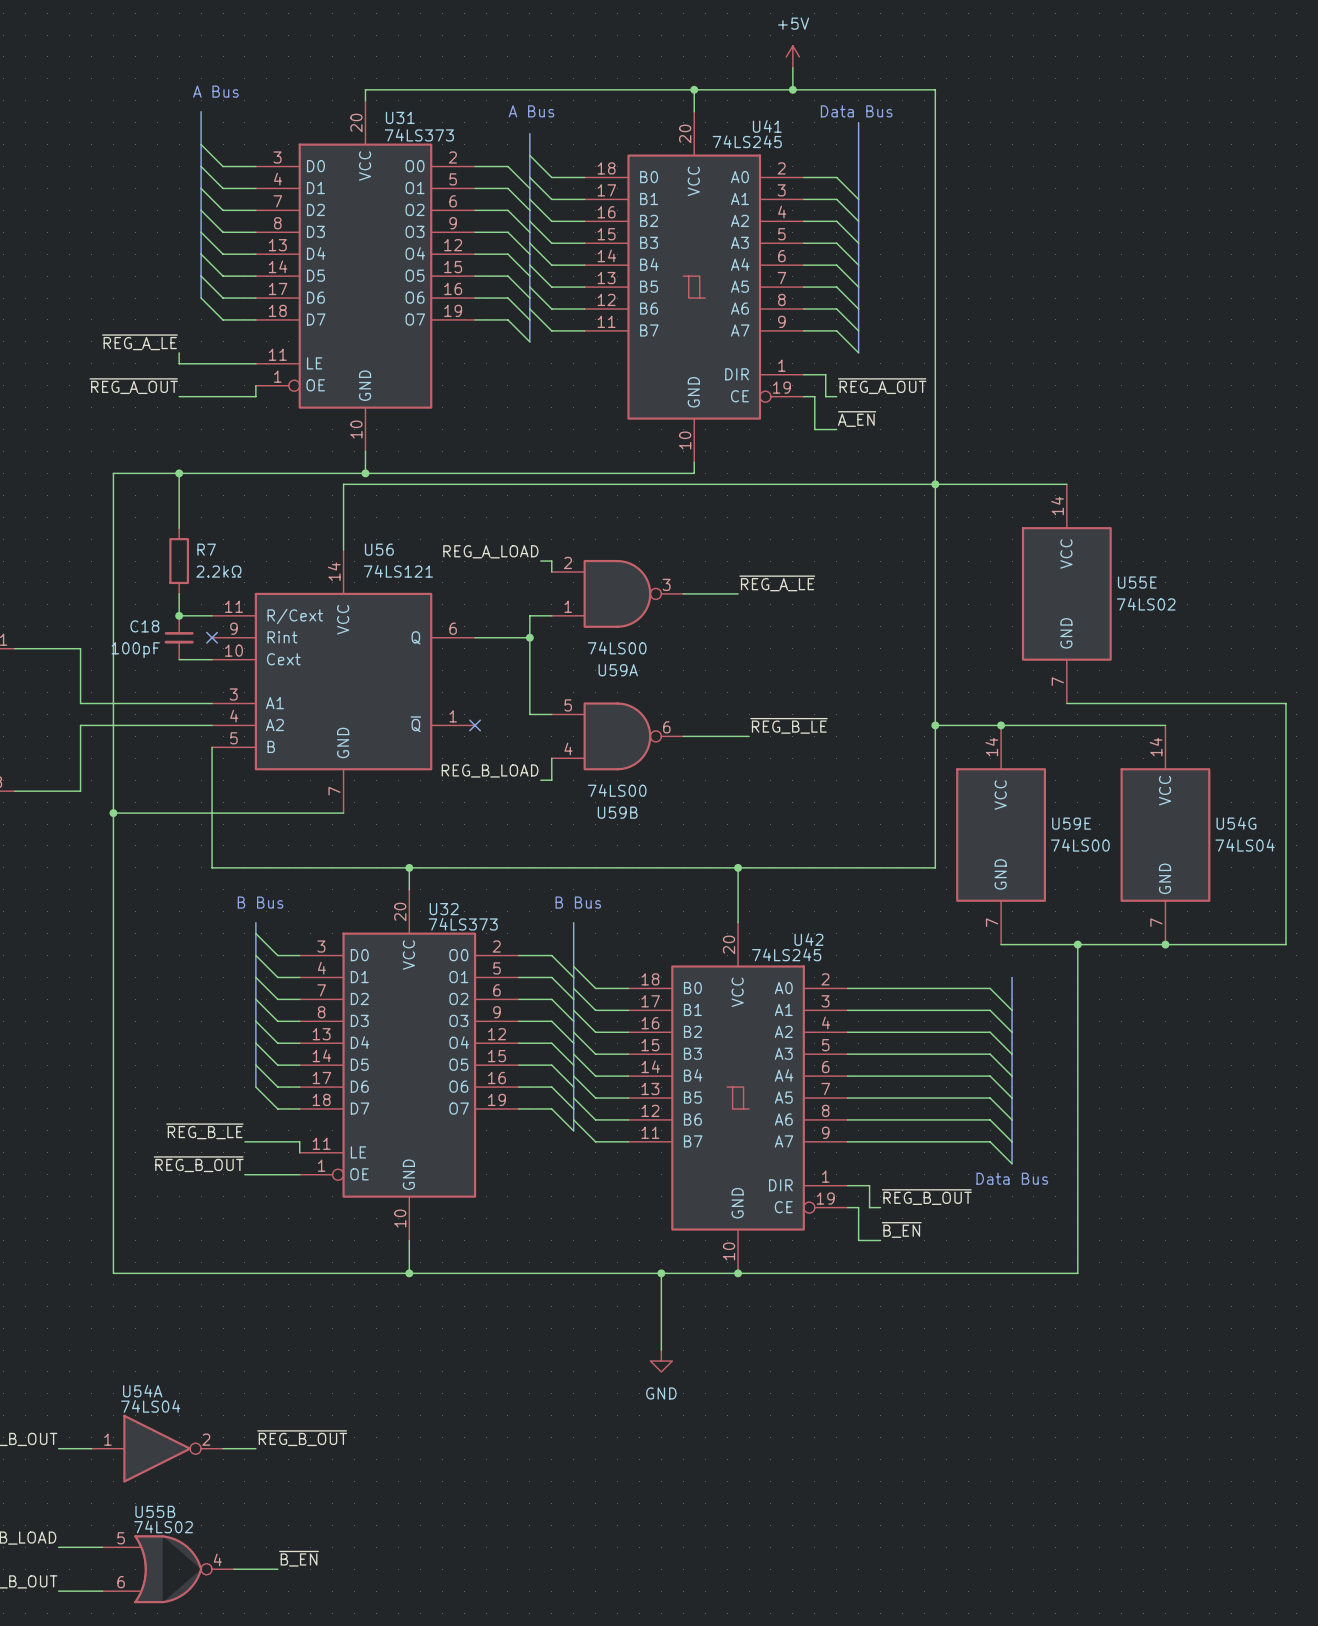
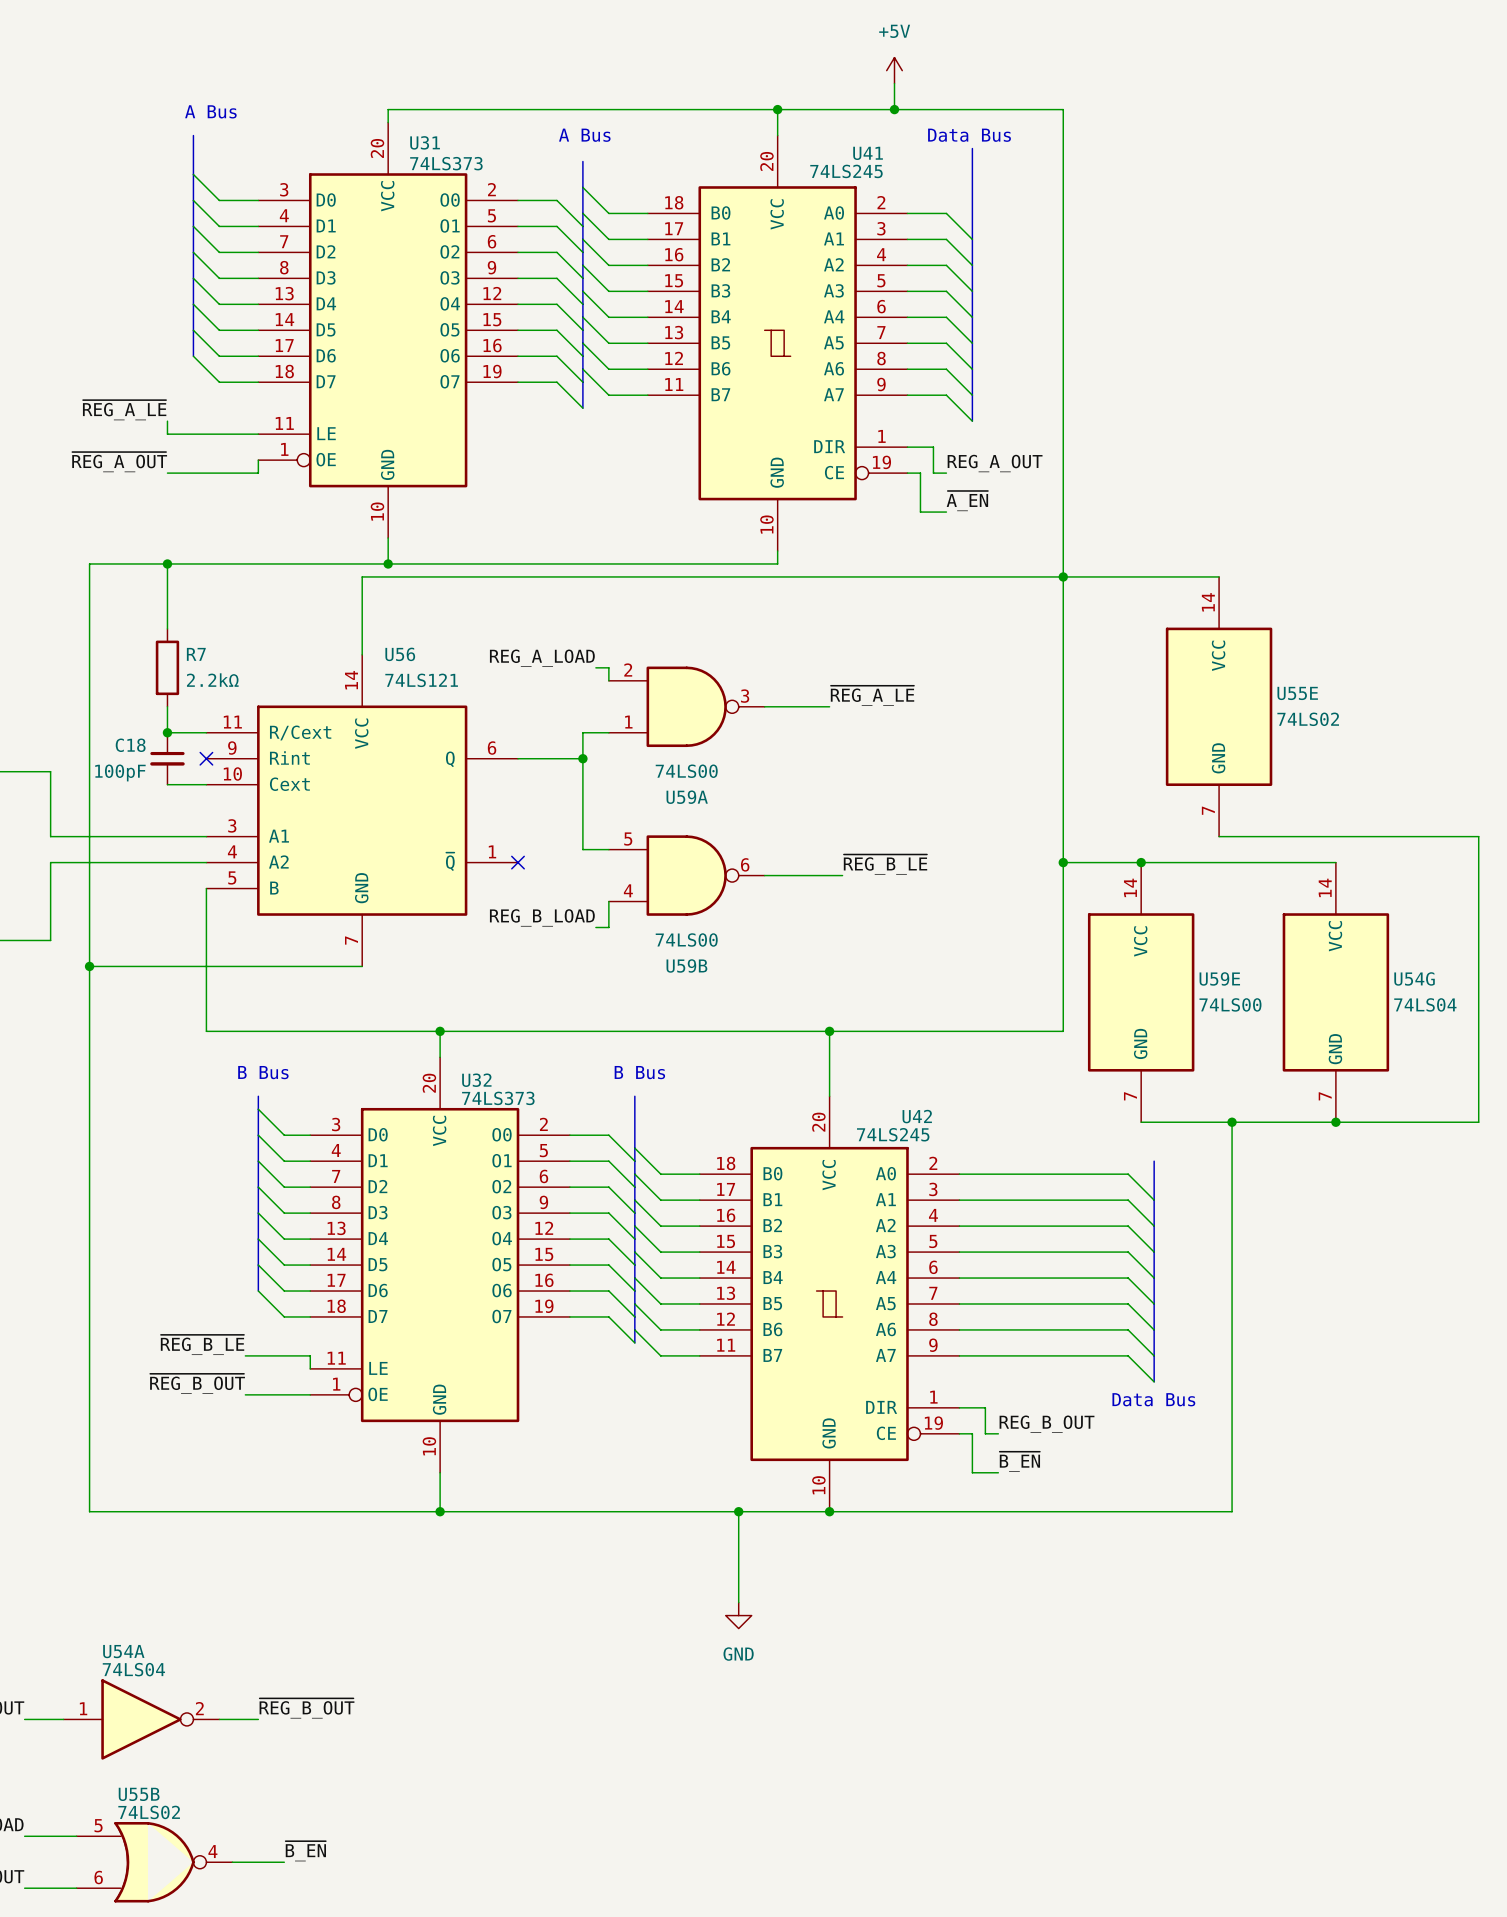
label: ~{REG_A_OUT} (882, 386) -> REG_A_OUT (995, 463)
label: ~{REG_B_OUT} (926, 1197) -> REG_B_OUT (1047, 1424)

